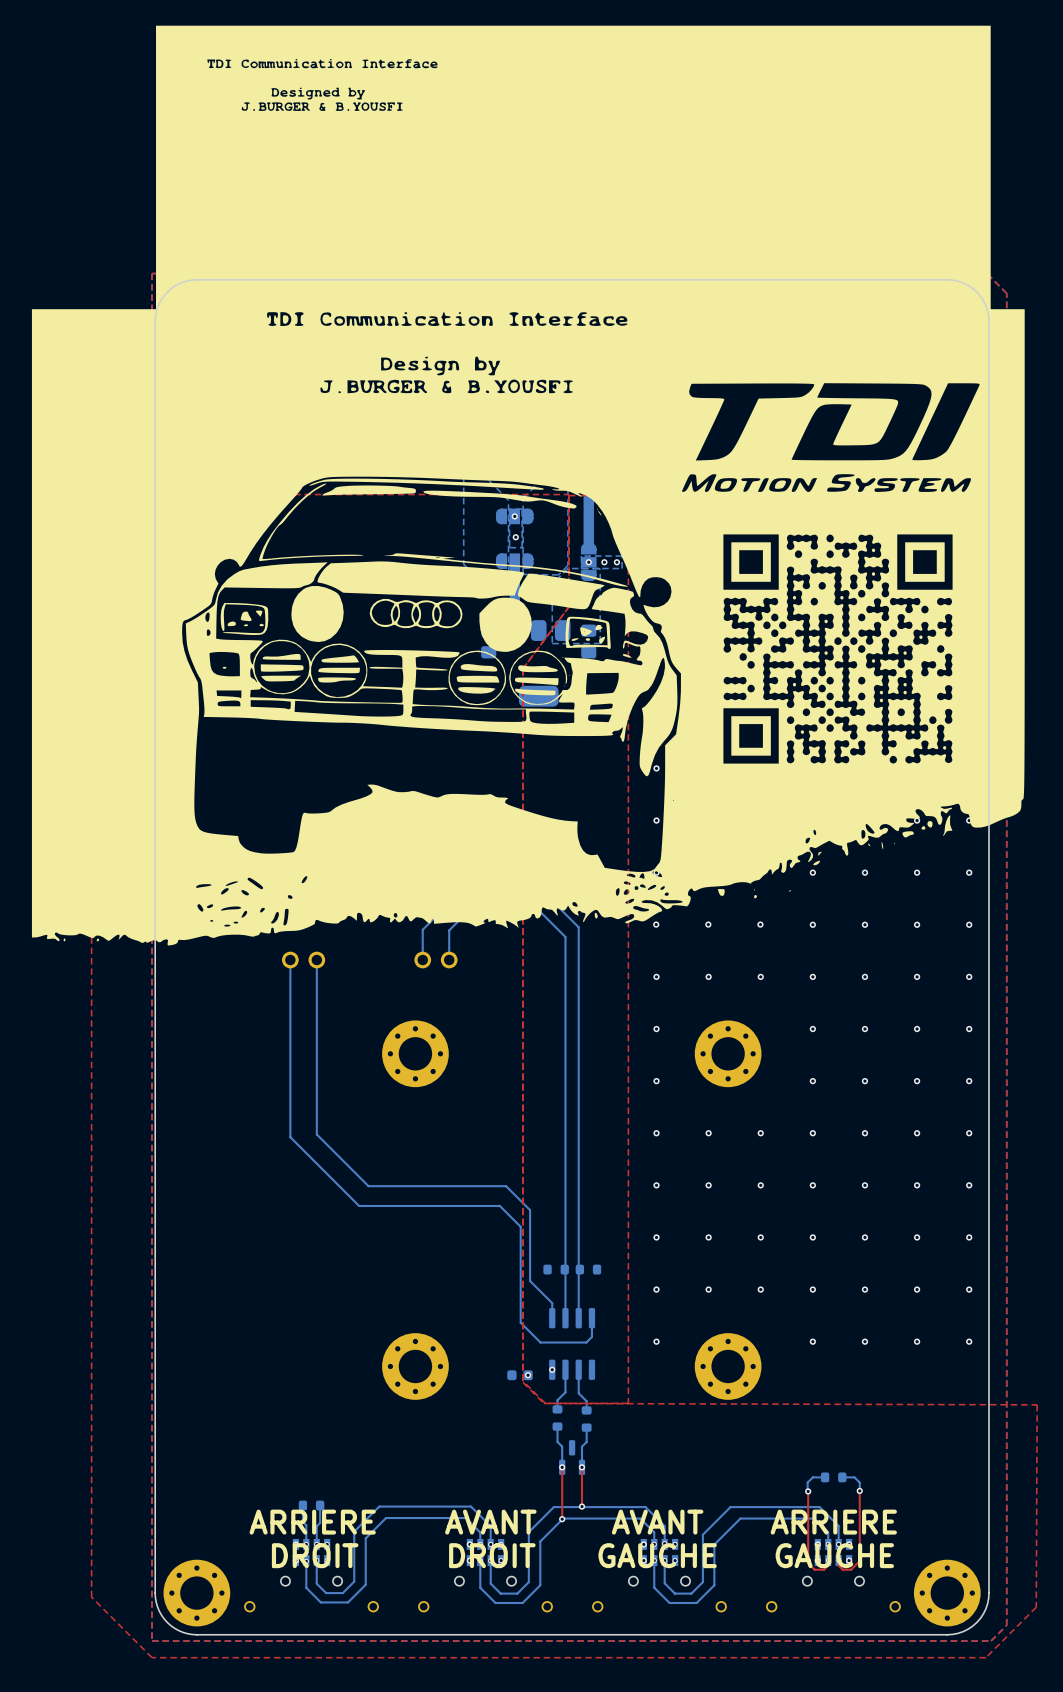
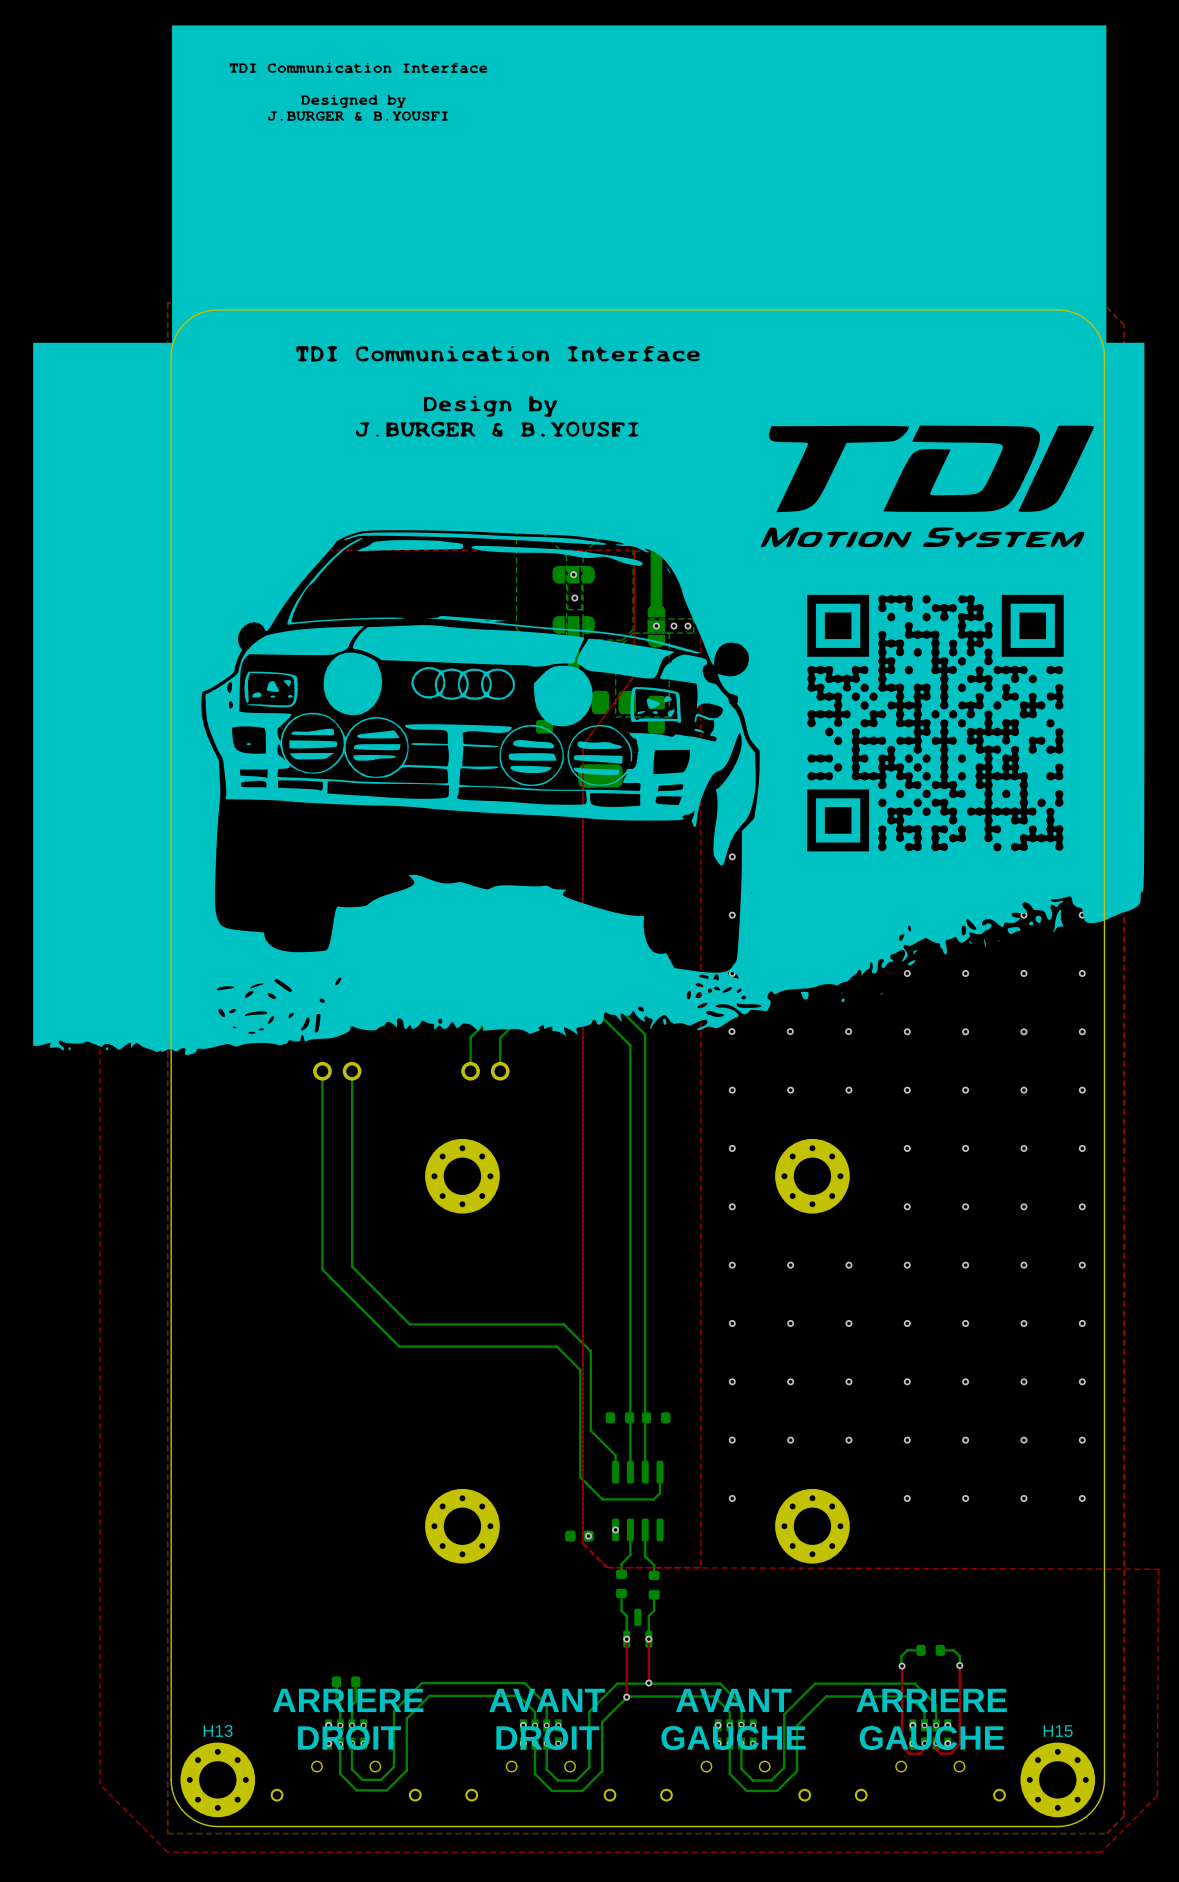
H13 name: none -> H13 (218, 1731)
H15 name: none -> H15 (1058, 1731)

